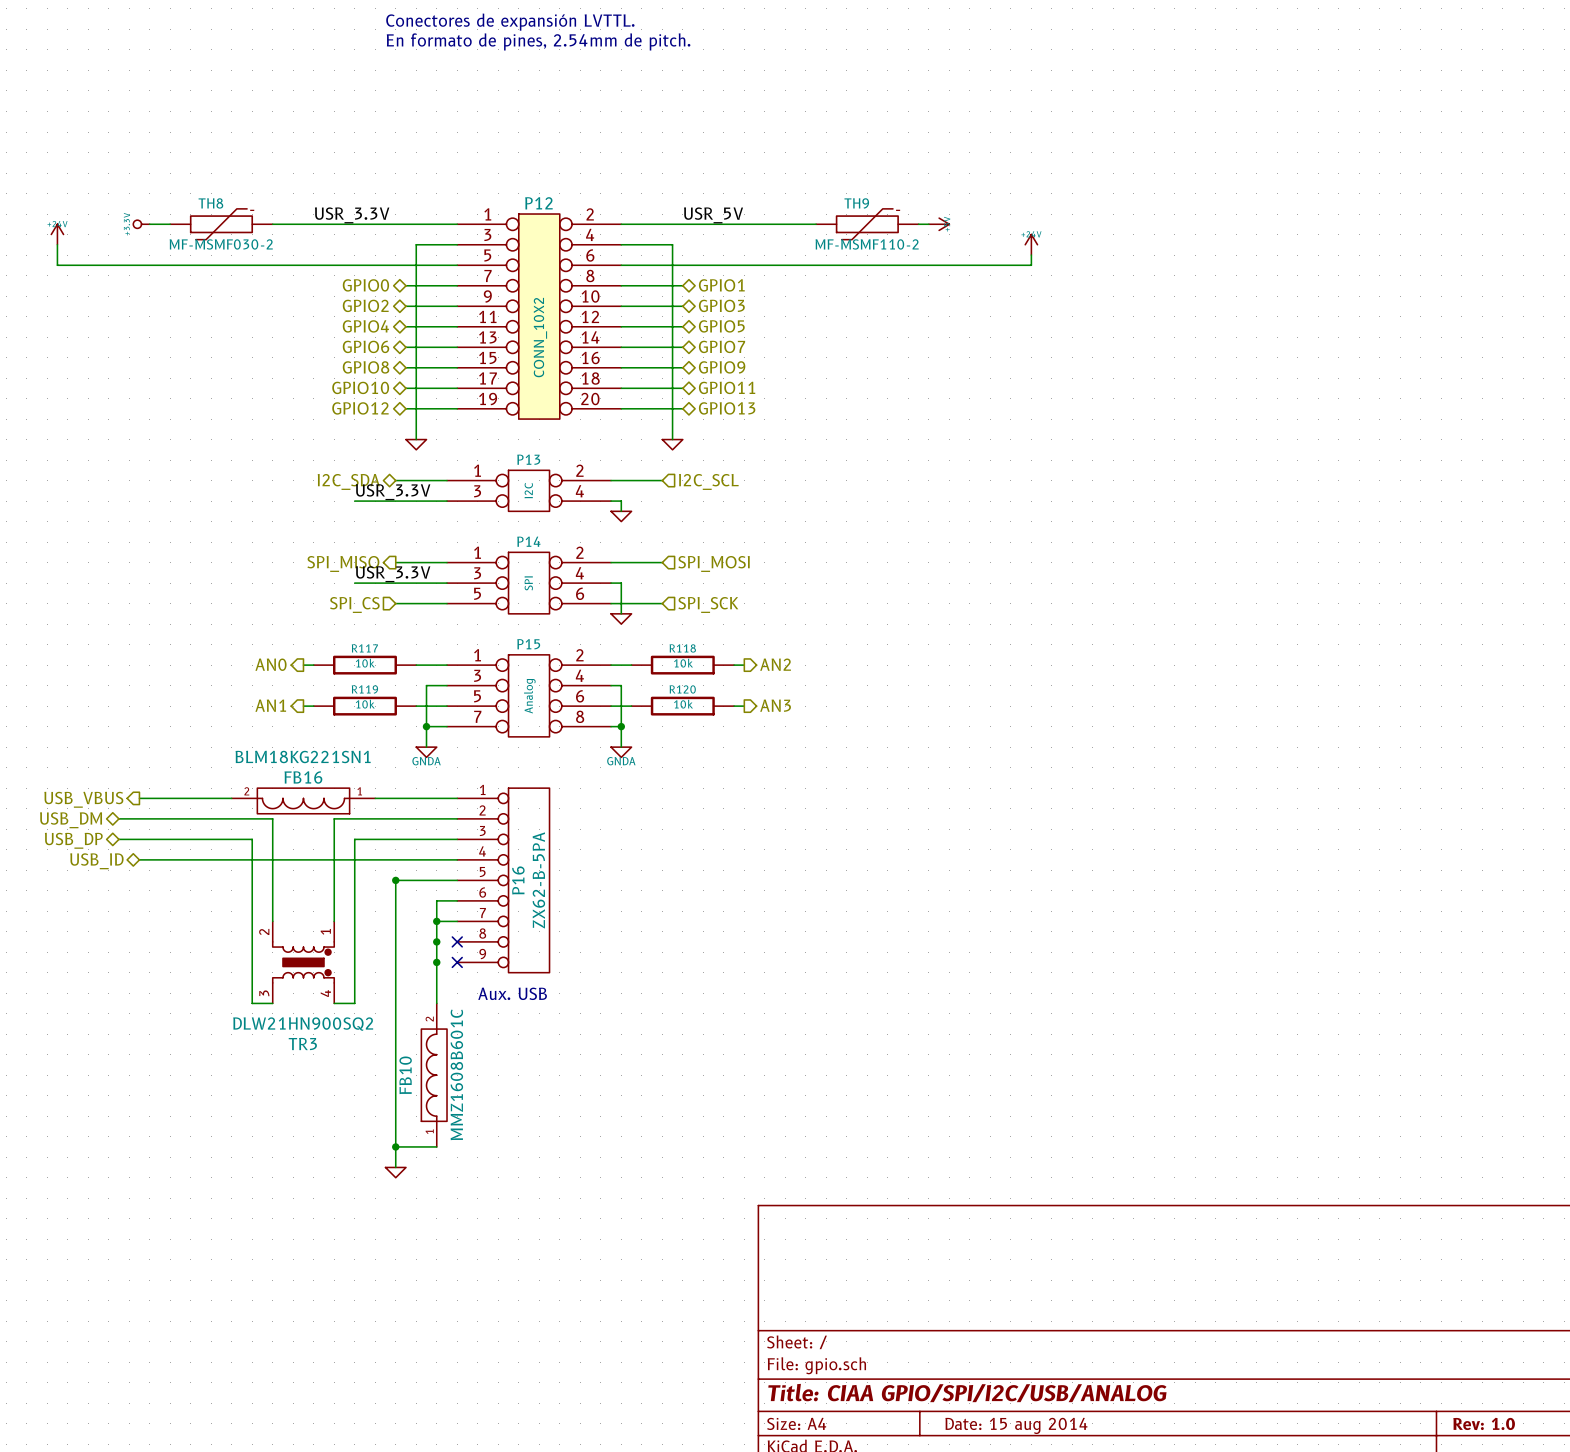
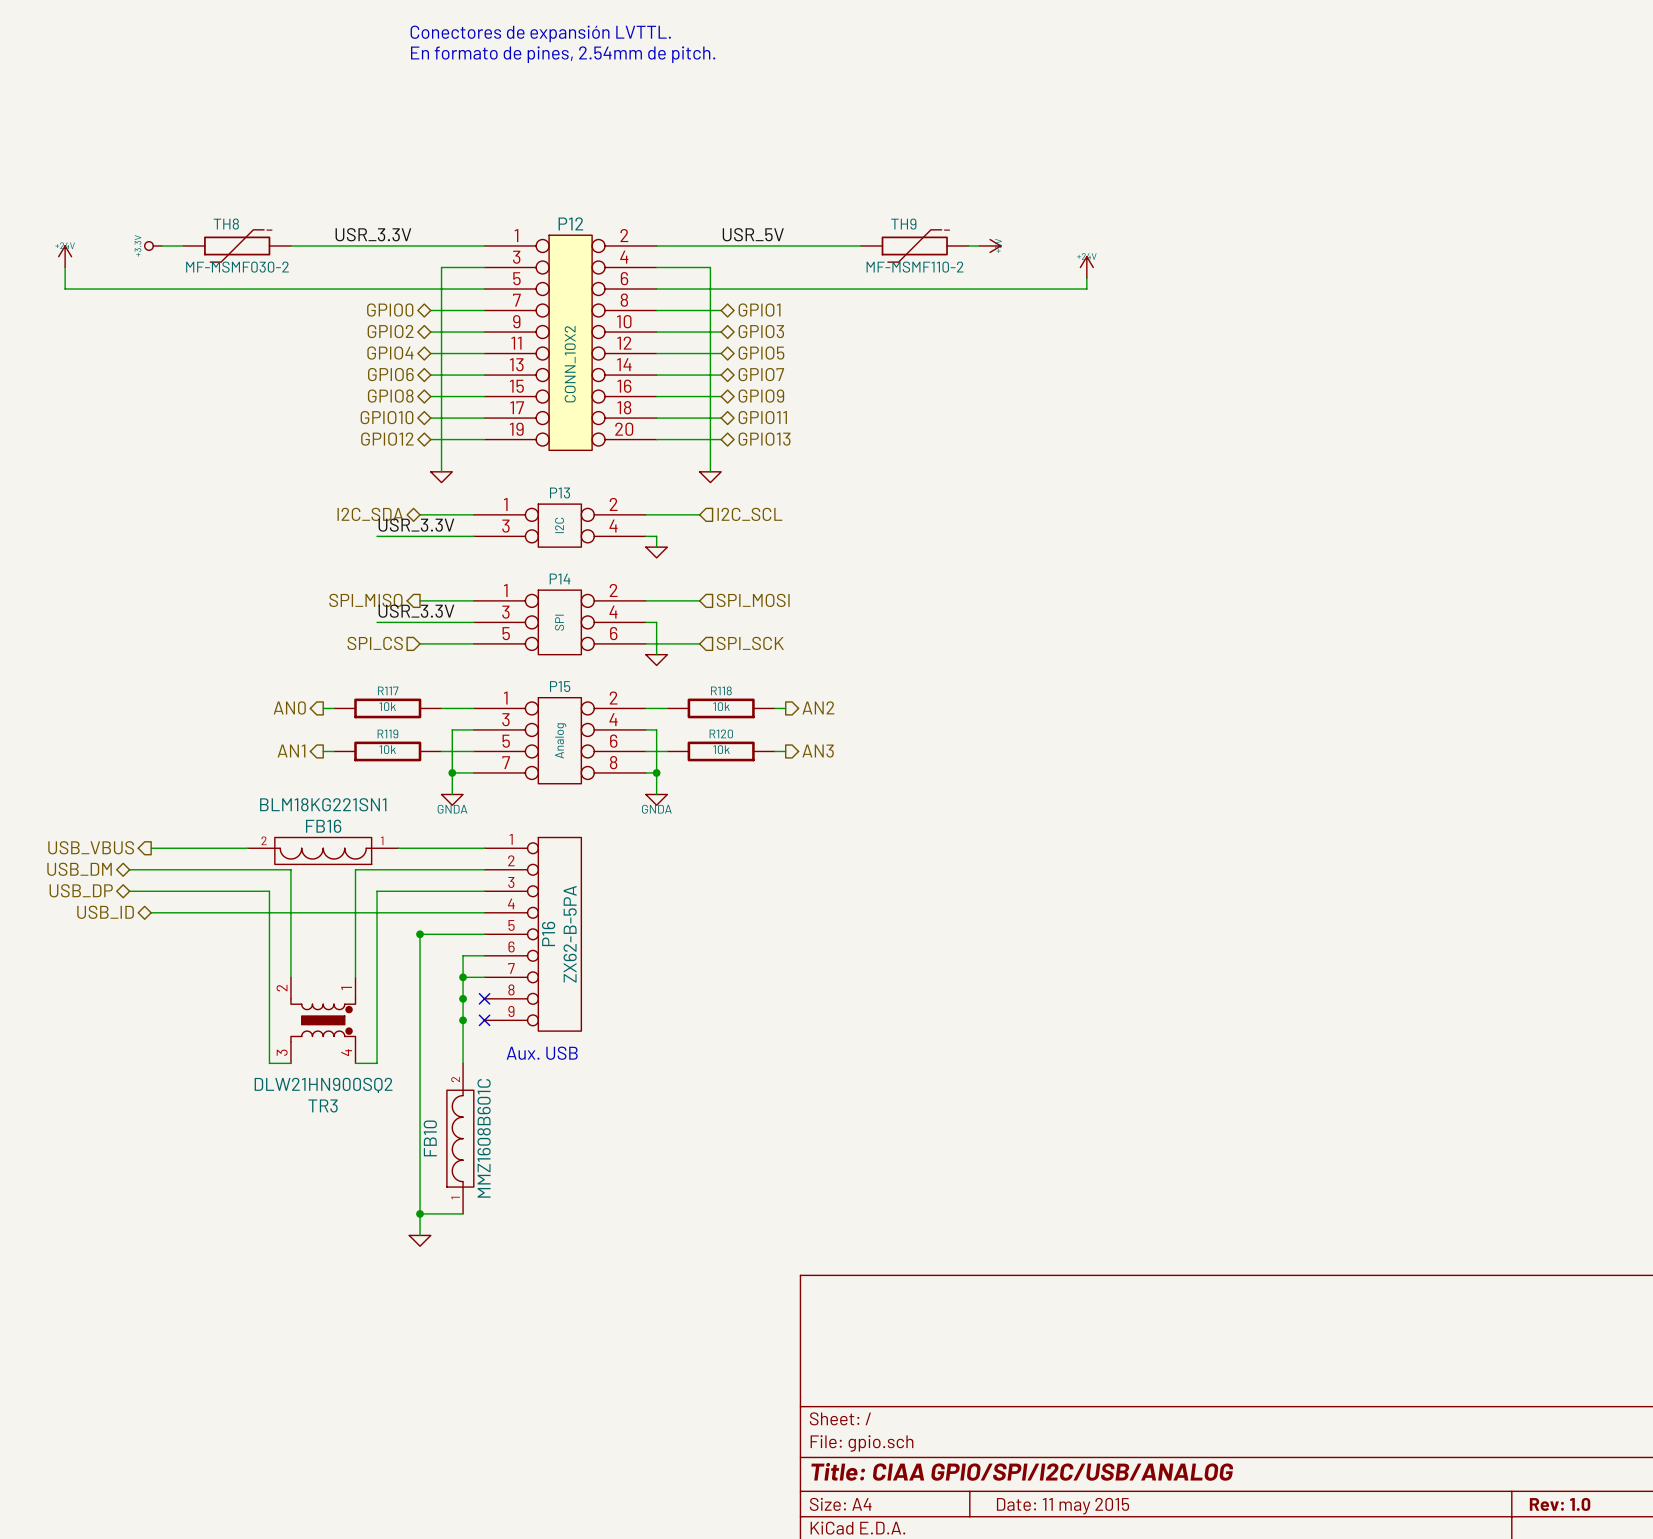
title block: Date: 15 aug 2014 (1016, 1425) -> Date: 11 may 2015 (1063, 1506)

